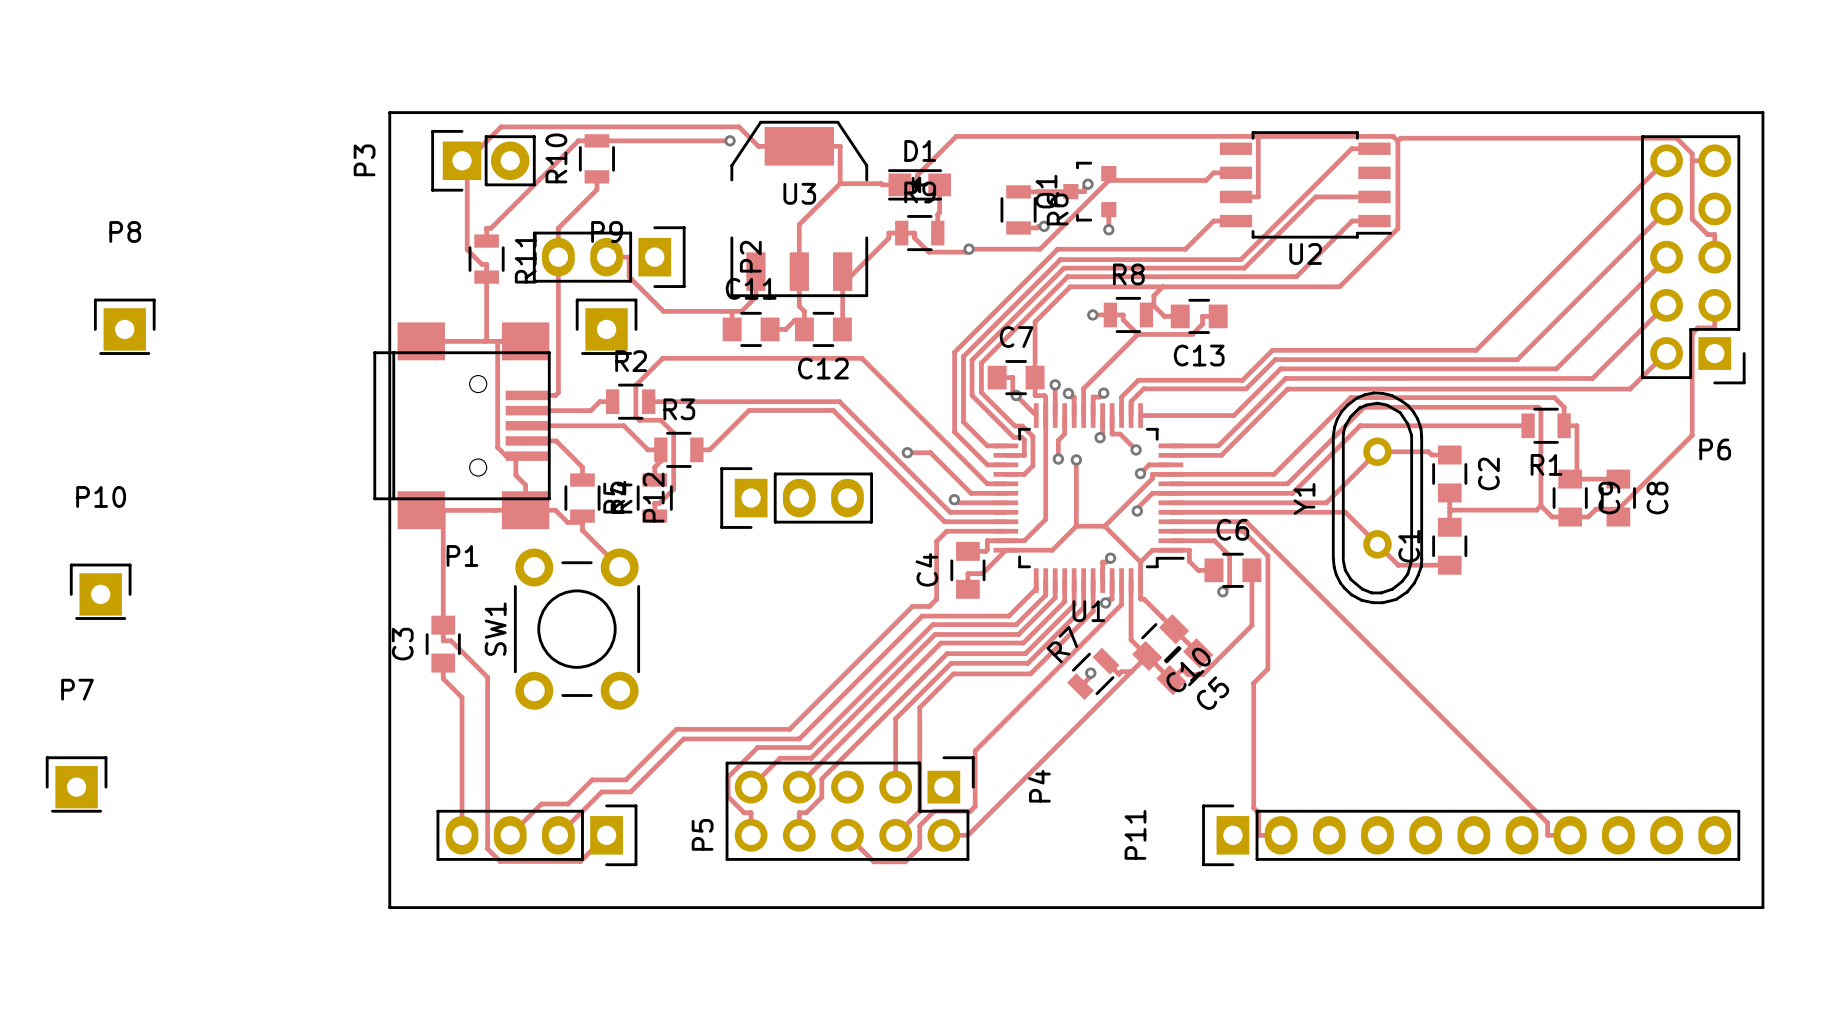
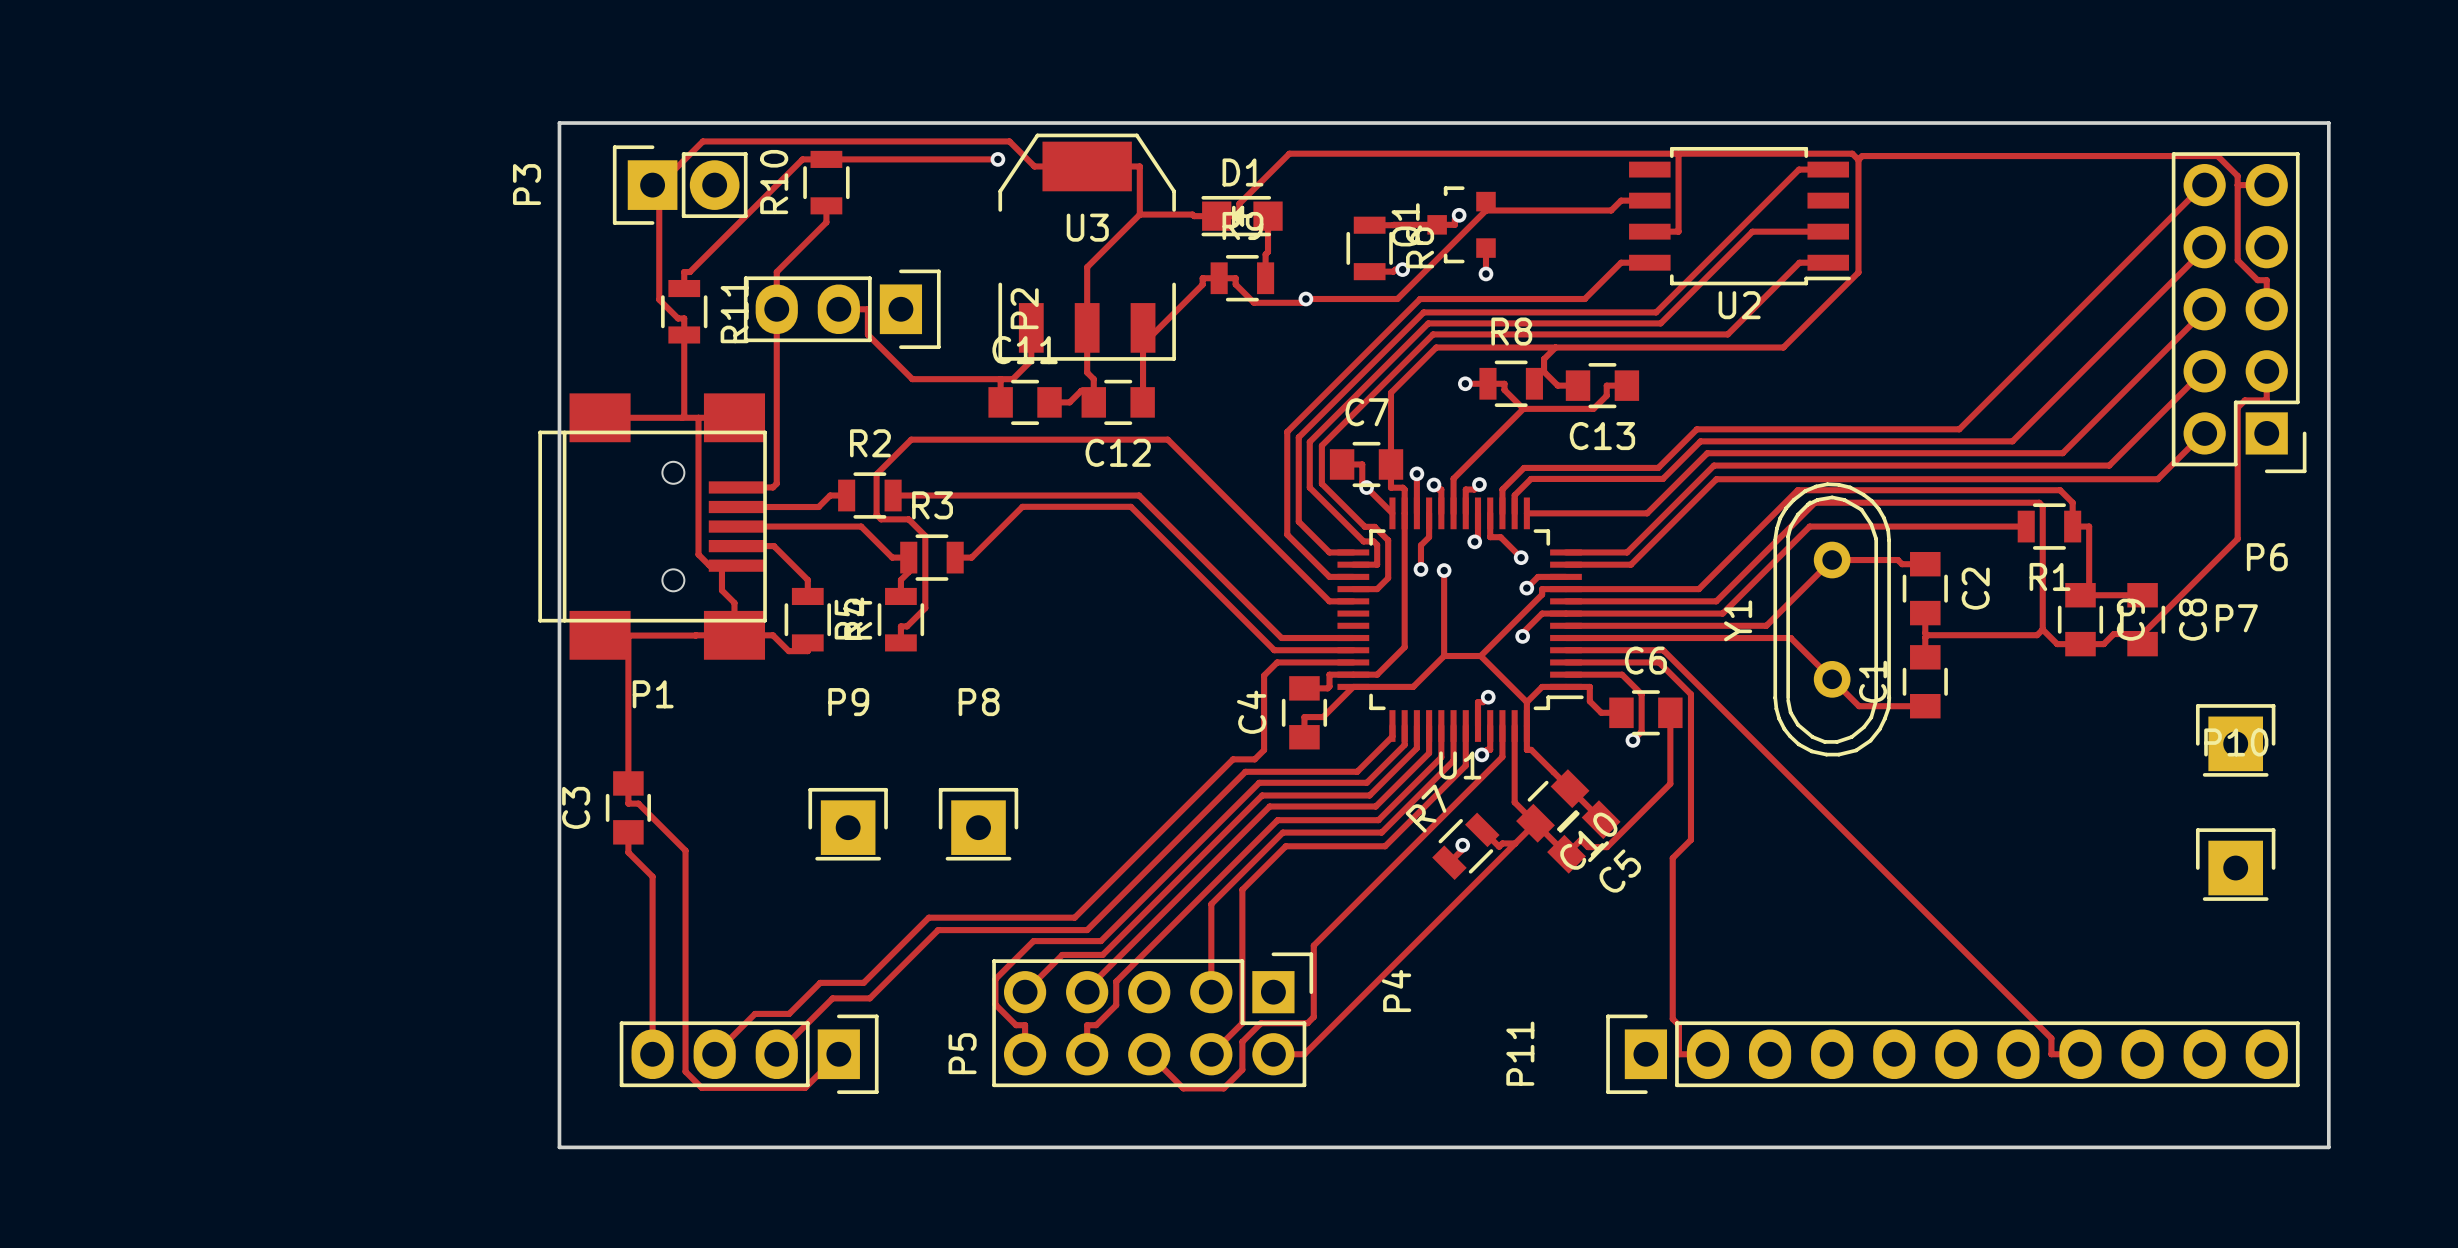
P8 position: (124, 326) -> (978, 824)
P9 position: (606, 326) -> (848, 824)
track: (907, 452) (930, 452) (971, 493) (1005, 493) -> none
via: (907, 452) -> none
P12: (796, 498) -> none
track: (954, 499) (957, 502) (1005, 502) -> none
via: (954, 499) -> none
track: (582, 522) (582, 530) (619, 567) -> none
P10 position: (100, 591) -> (2235, 864)
SW1: (576, 629) -> none
P7 position: (76, 784) -> (2235, 740)

